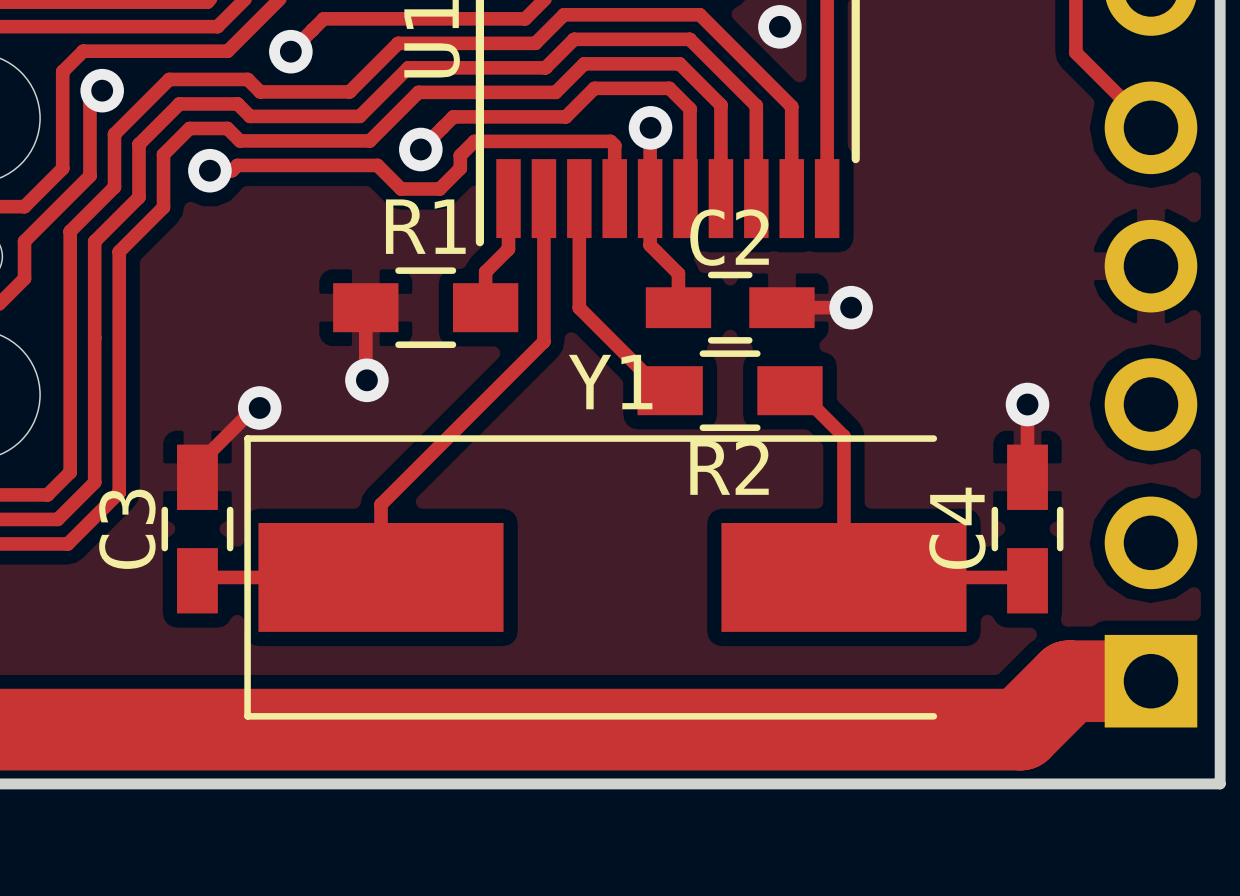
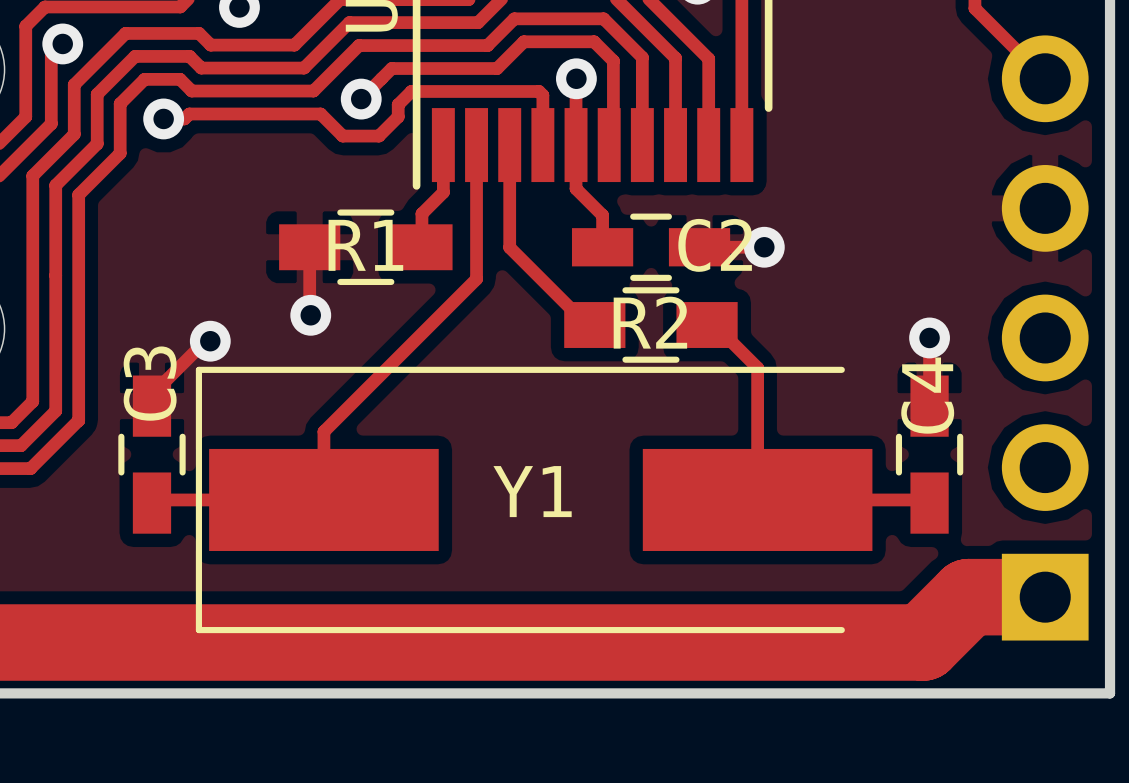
R1 name position: R1 (425, 226) -> R1 (365, 245)
C2 name position: C2 (729, 237) -> C2 (715, 245)
Y1 name position: Y1 (610, 382) -> Y1 (532, 491)
R2 name position: R2 (729, 467) -> R2 (650, 322)
C4 name position: C4 (957, 528) -> C4 (927, 395)
C3 name position: C3 (127, 529) -> C3 (150, 383)

